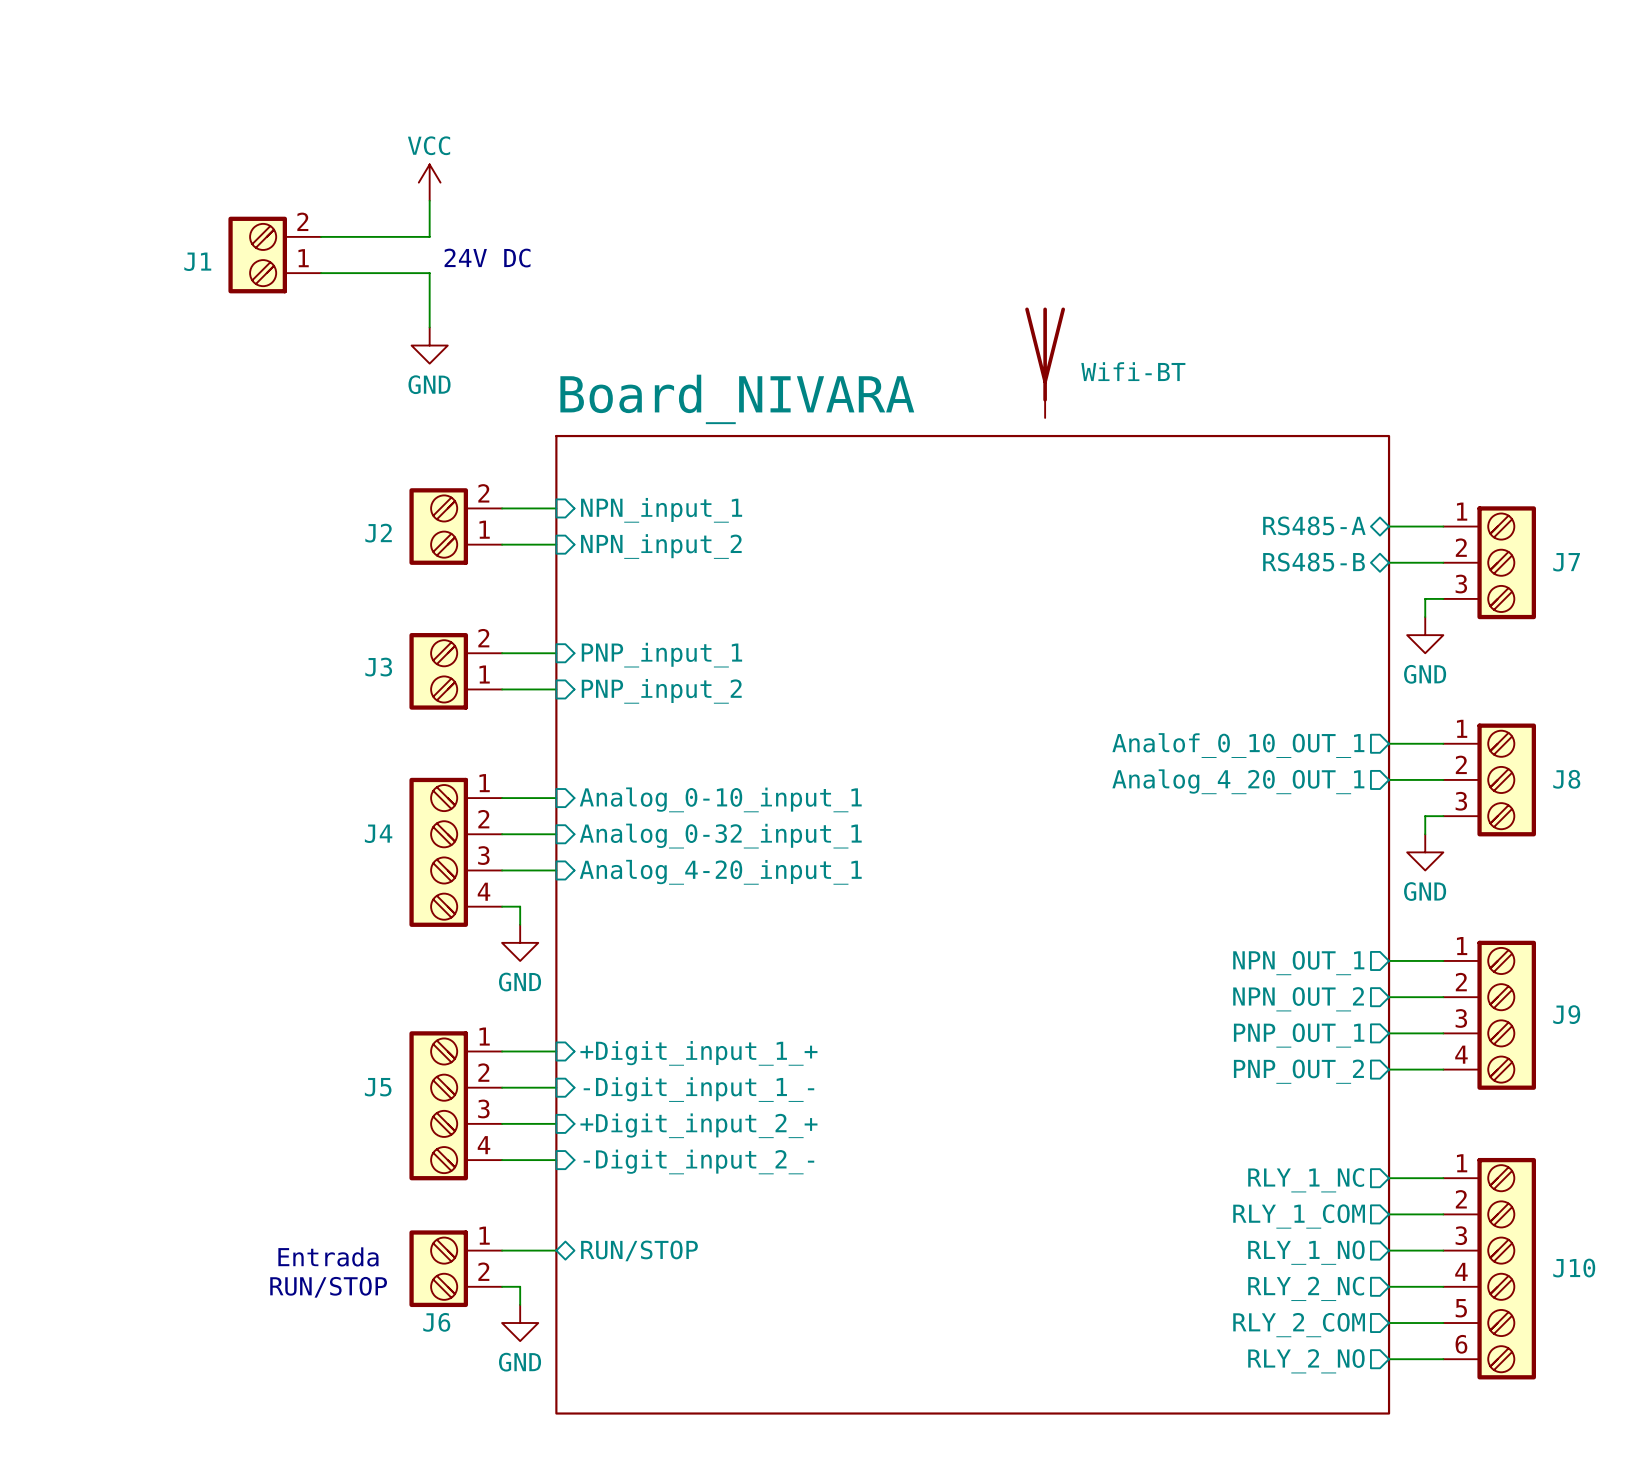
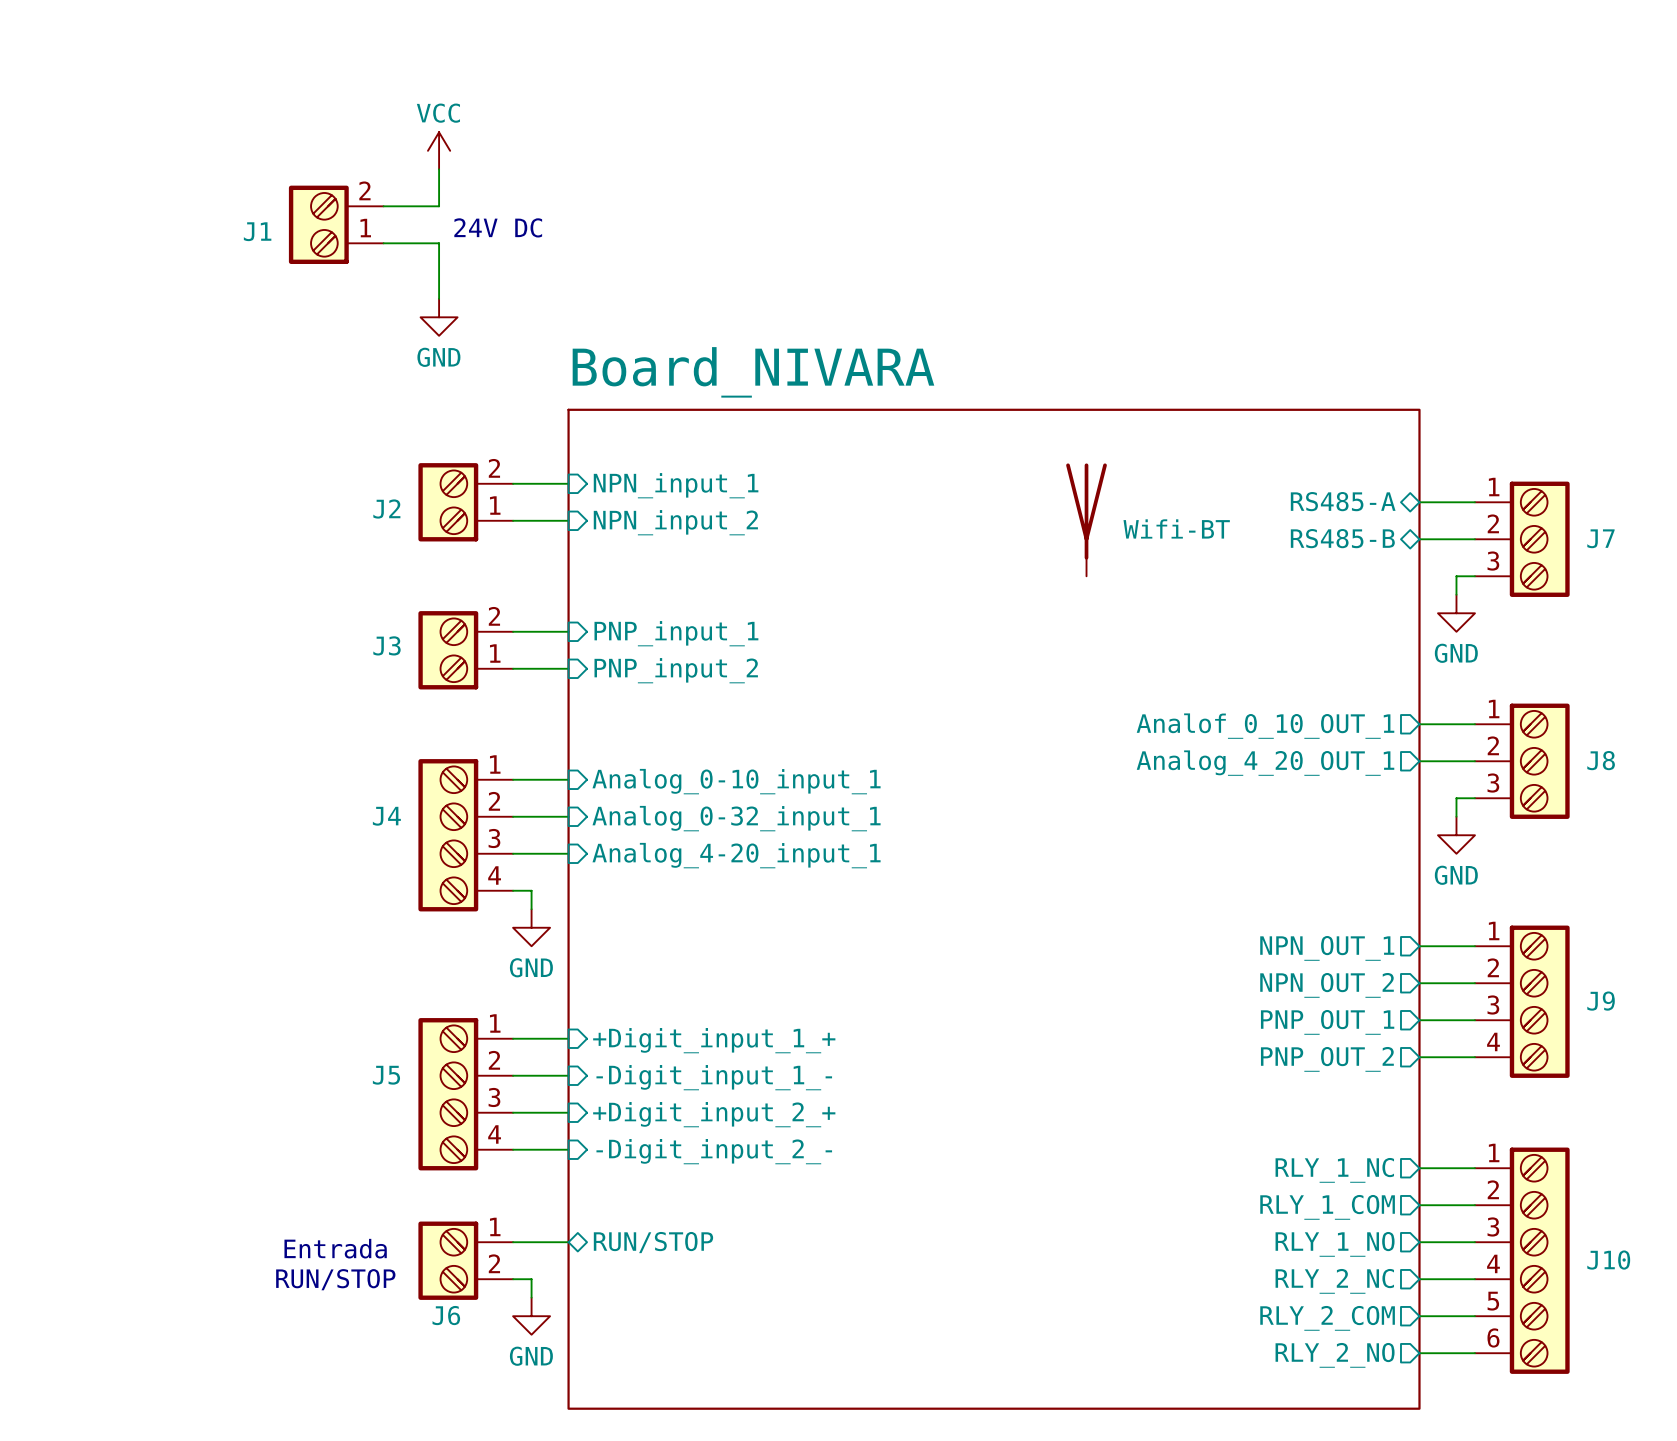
J1 position: (274, 255) -> (336, 224)
part position: (1045, 362) -> (1086, 519)

